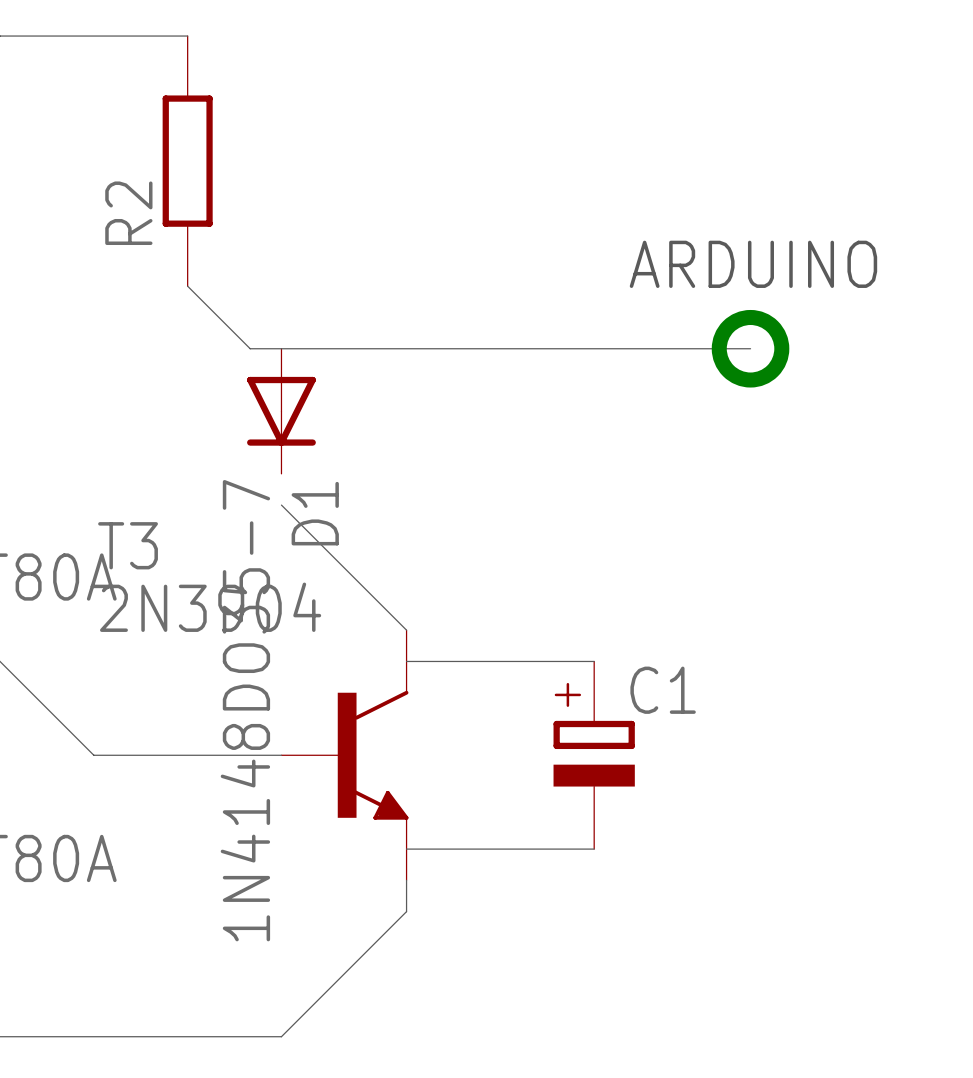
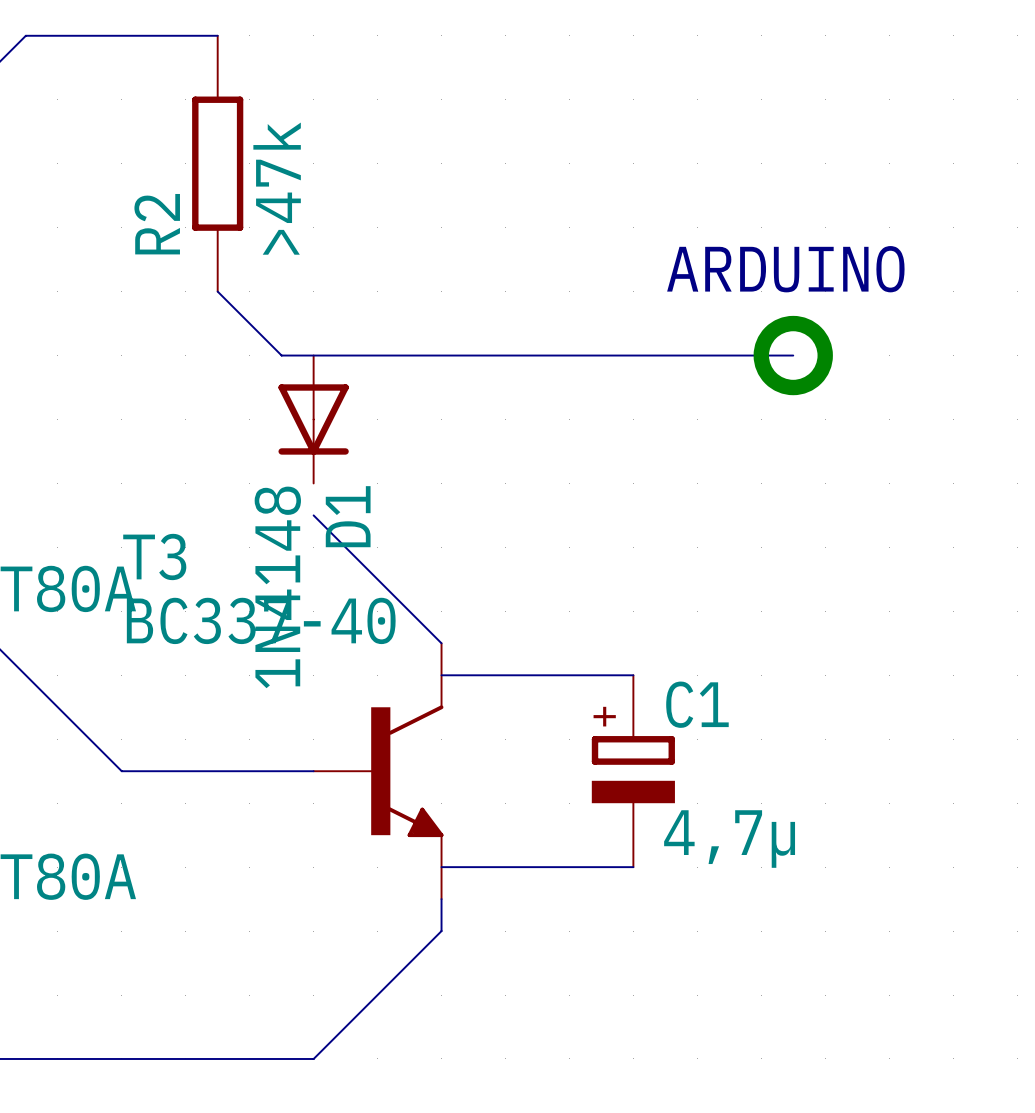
R2 value: none -> >47k (277, 188)
T3 value: 2N3904 (210, 607) -> BC337-40 (261, 620)
D1 value: 1N4148DO35-7 (245, 710) -> 1N4148 (277, 587)
C1 value: none -> 4,7µ (729, 839)

